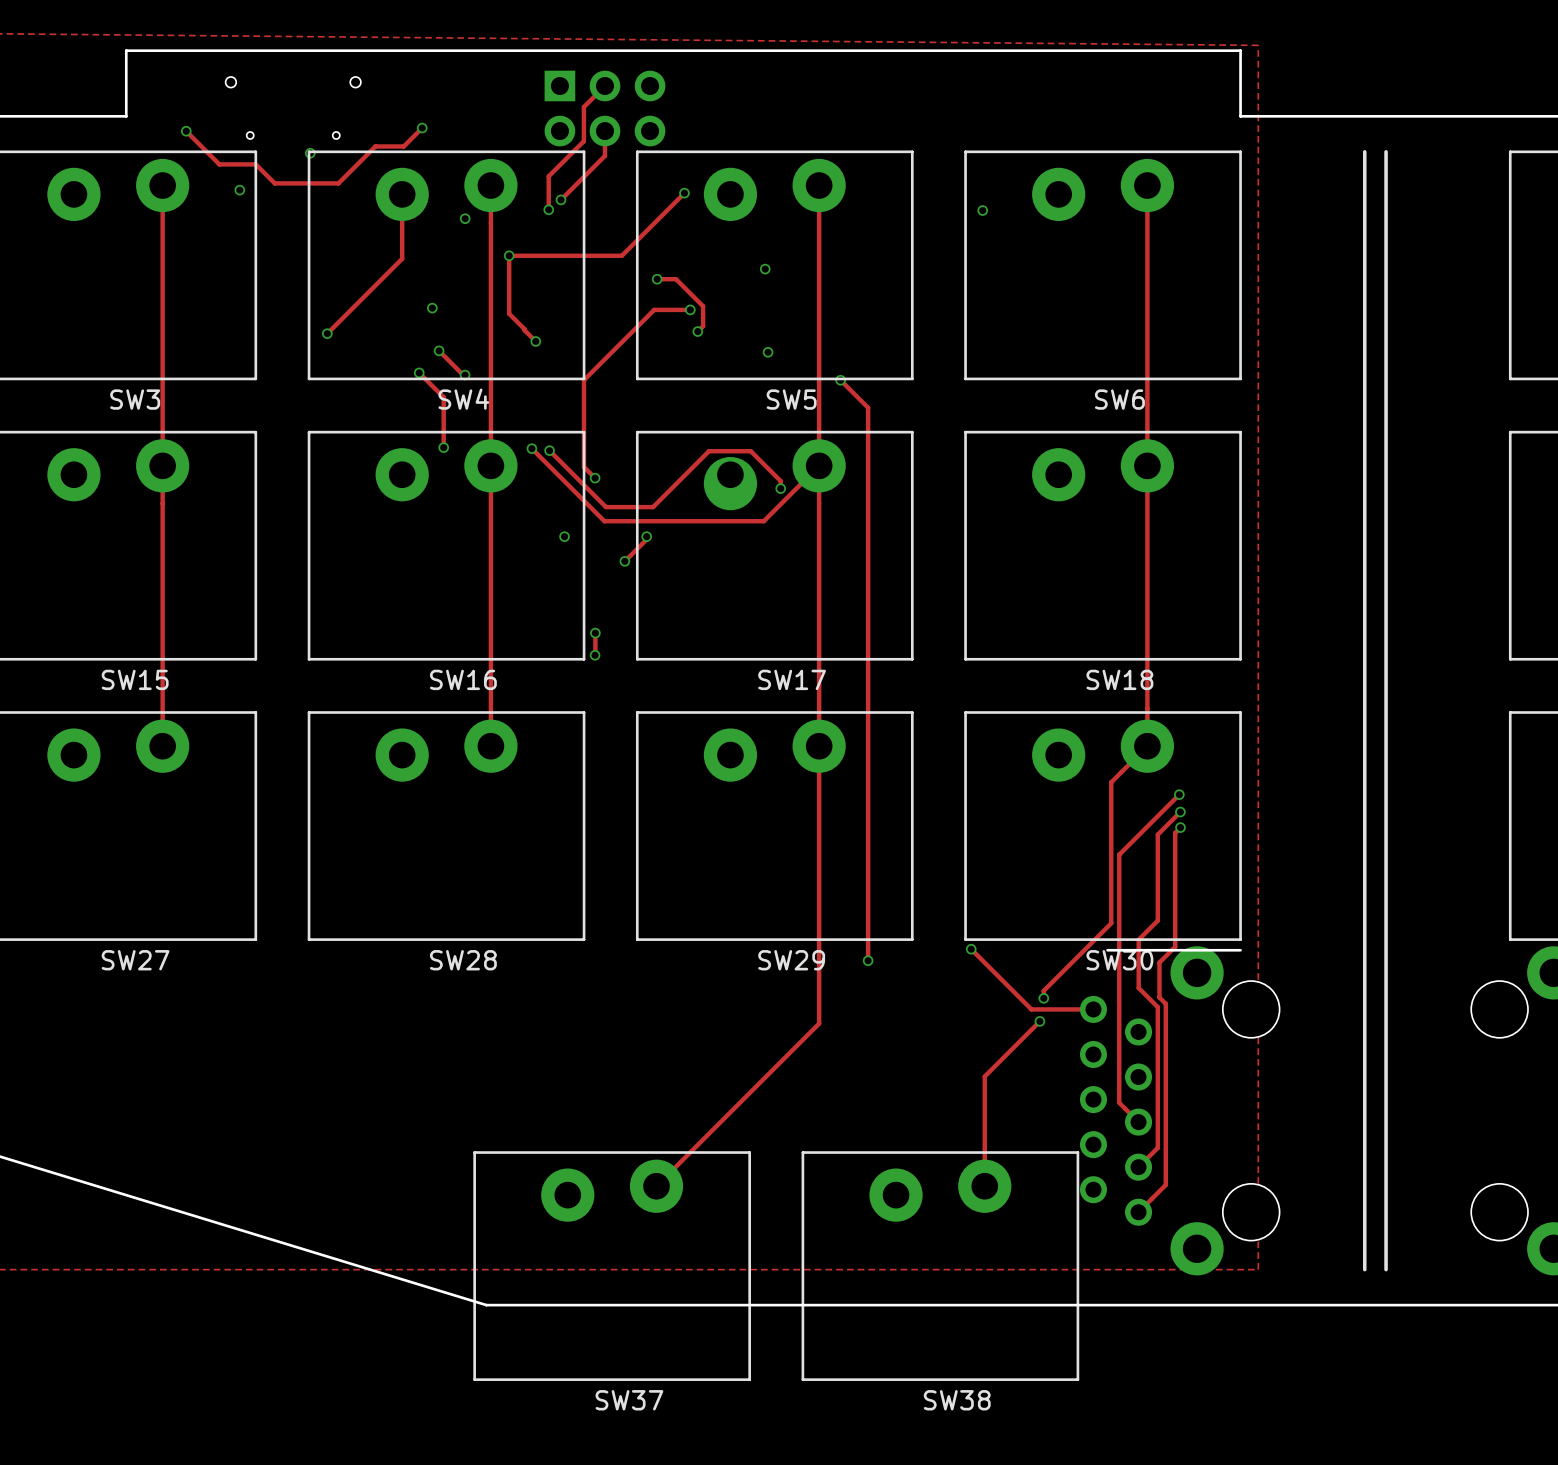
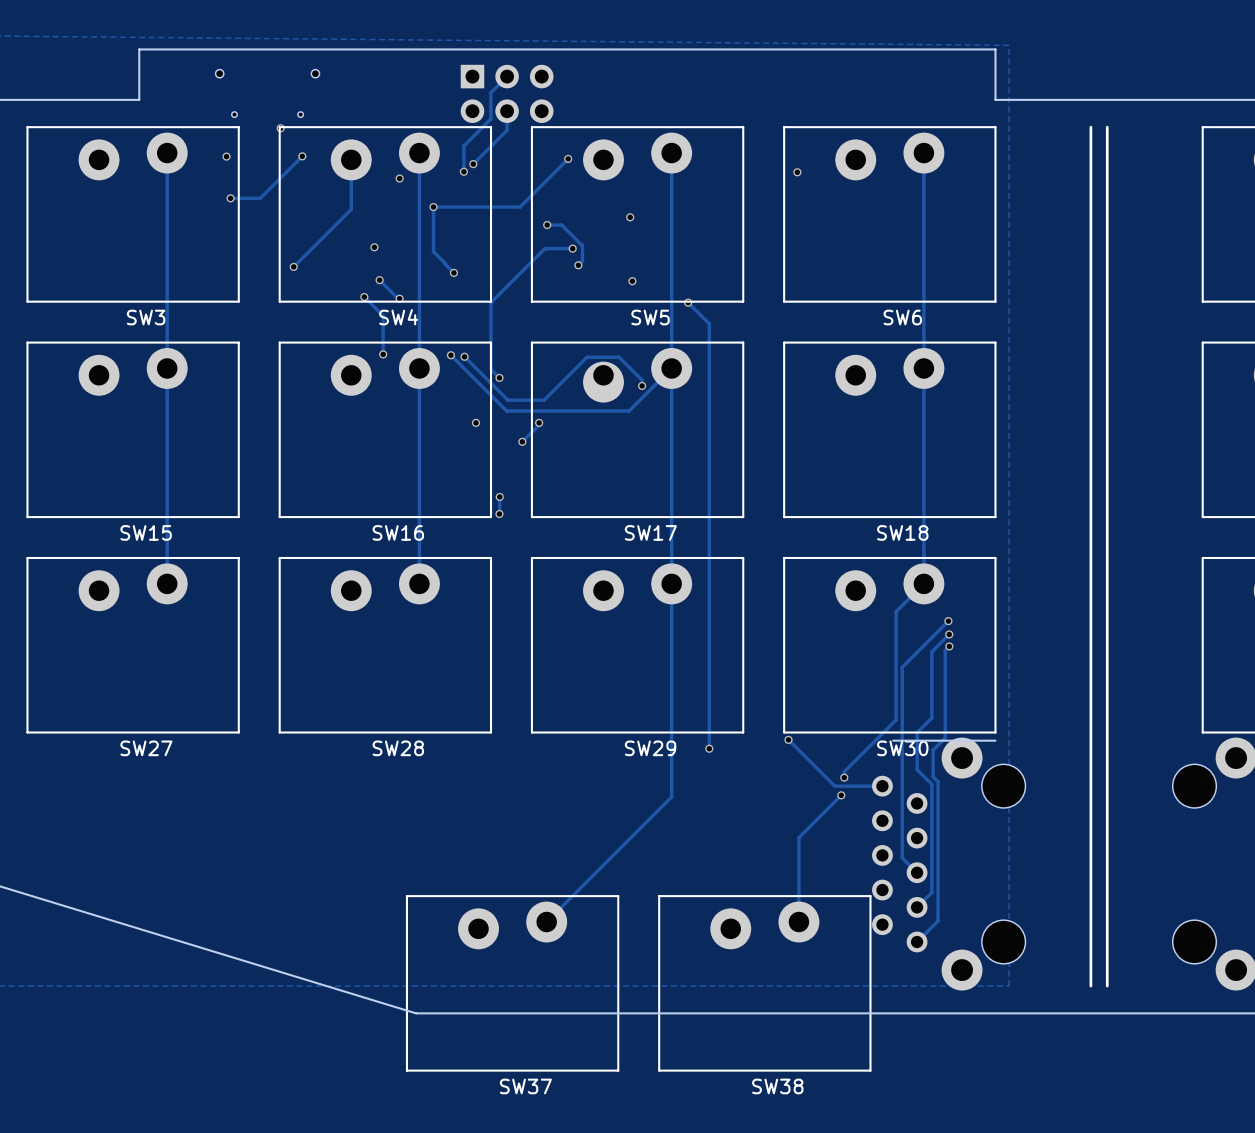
track: (422, 128) (403, 146) (375, 146) (338, 183) (274, 183) (255, 164) (219, 164) (186, 131) -> none
via: (422, 128) -> none
via: (186, 131) -> none
track: none -> (302, 156) (260, 198) (230, 198)
via: none -> (302, 156)
via: none -> (230, 198)

